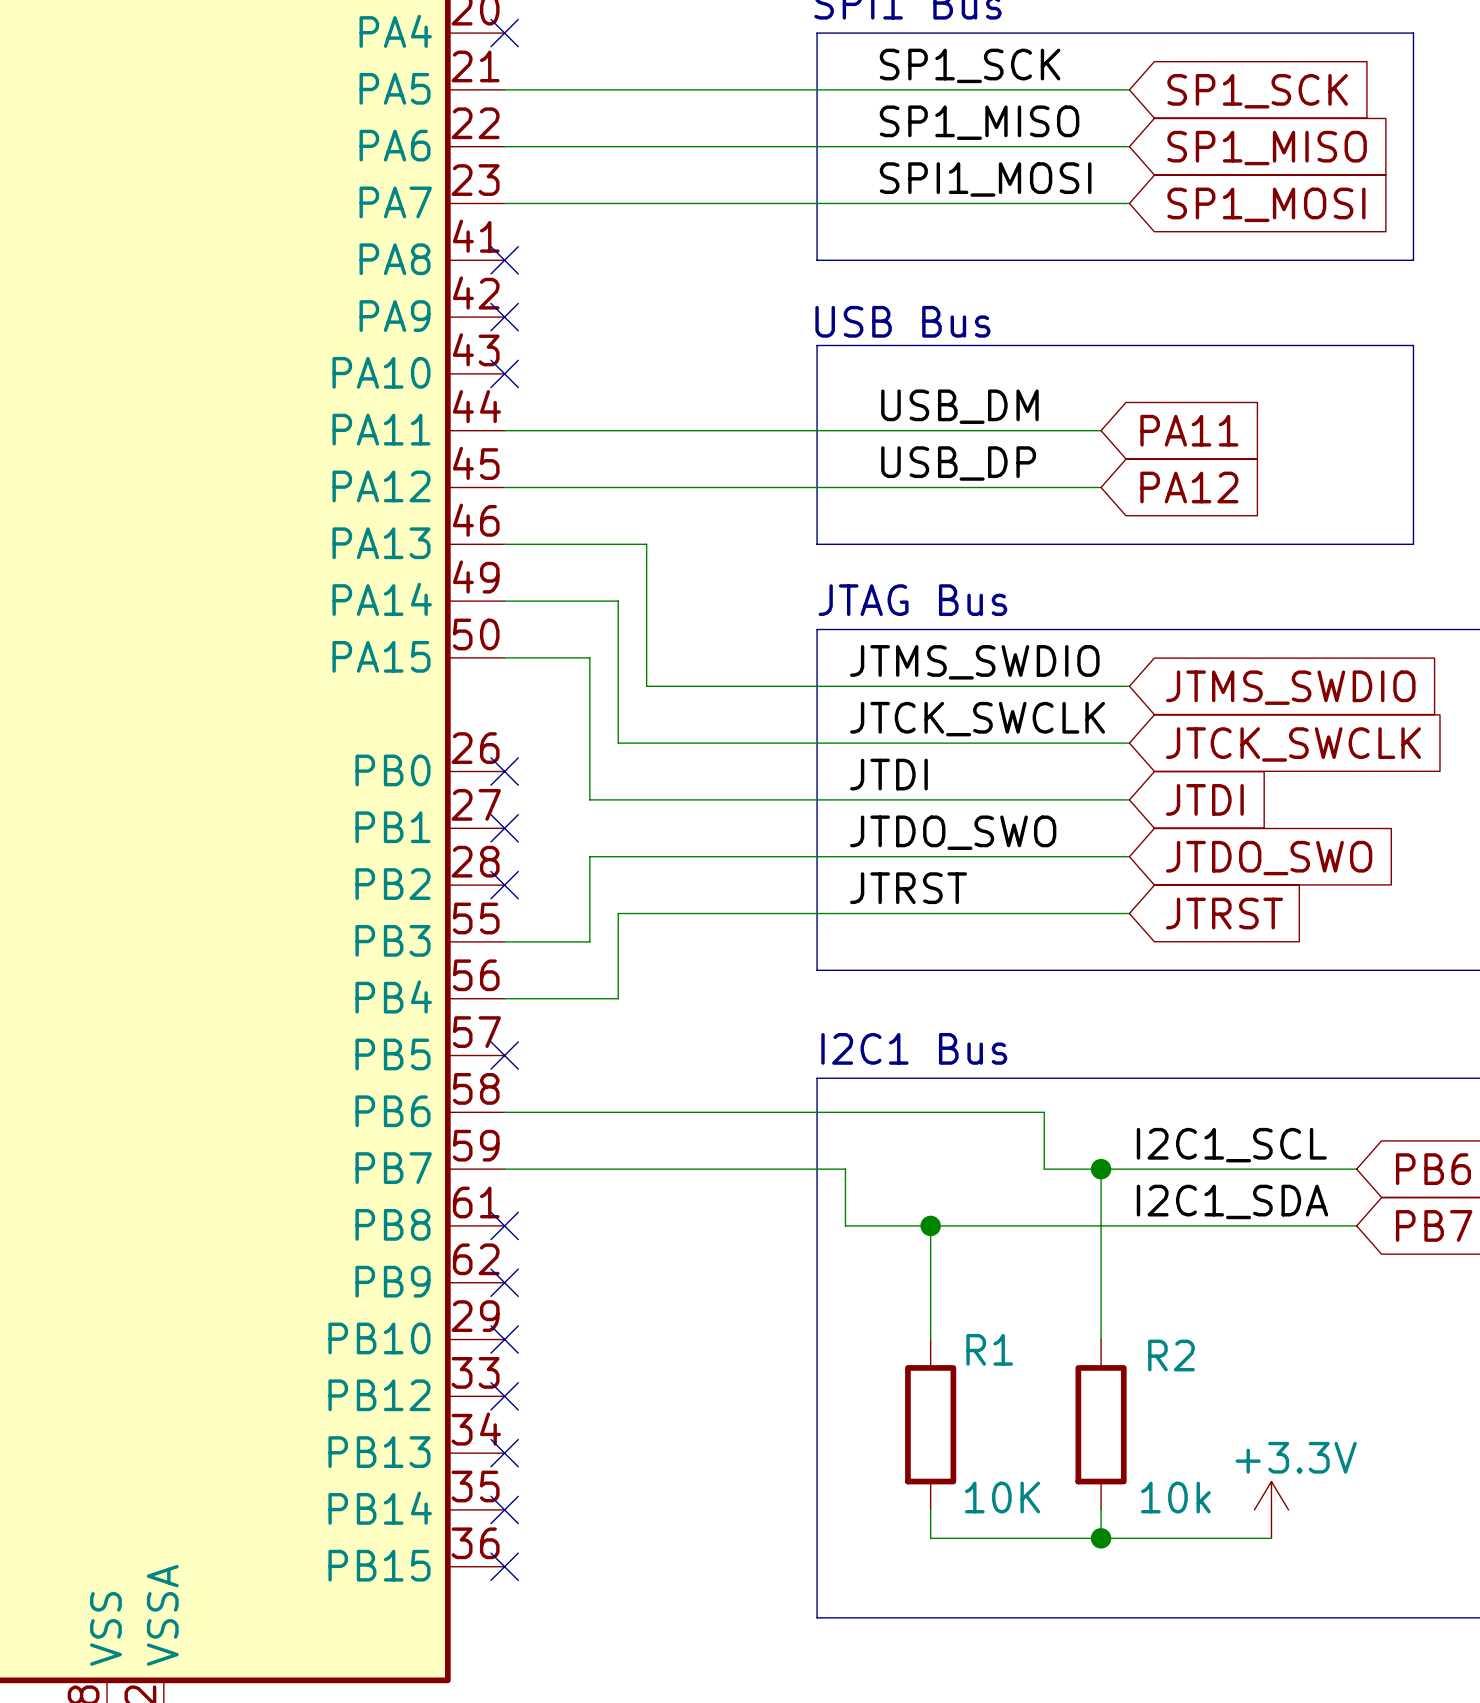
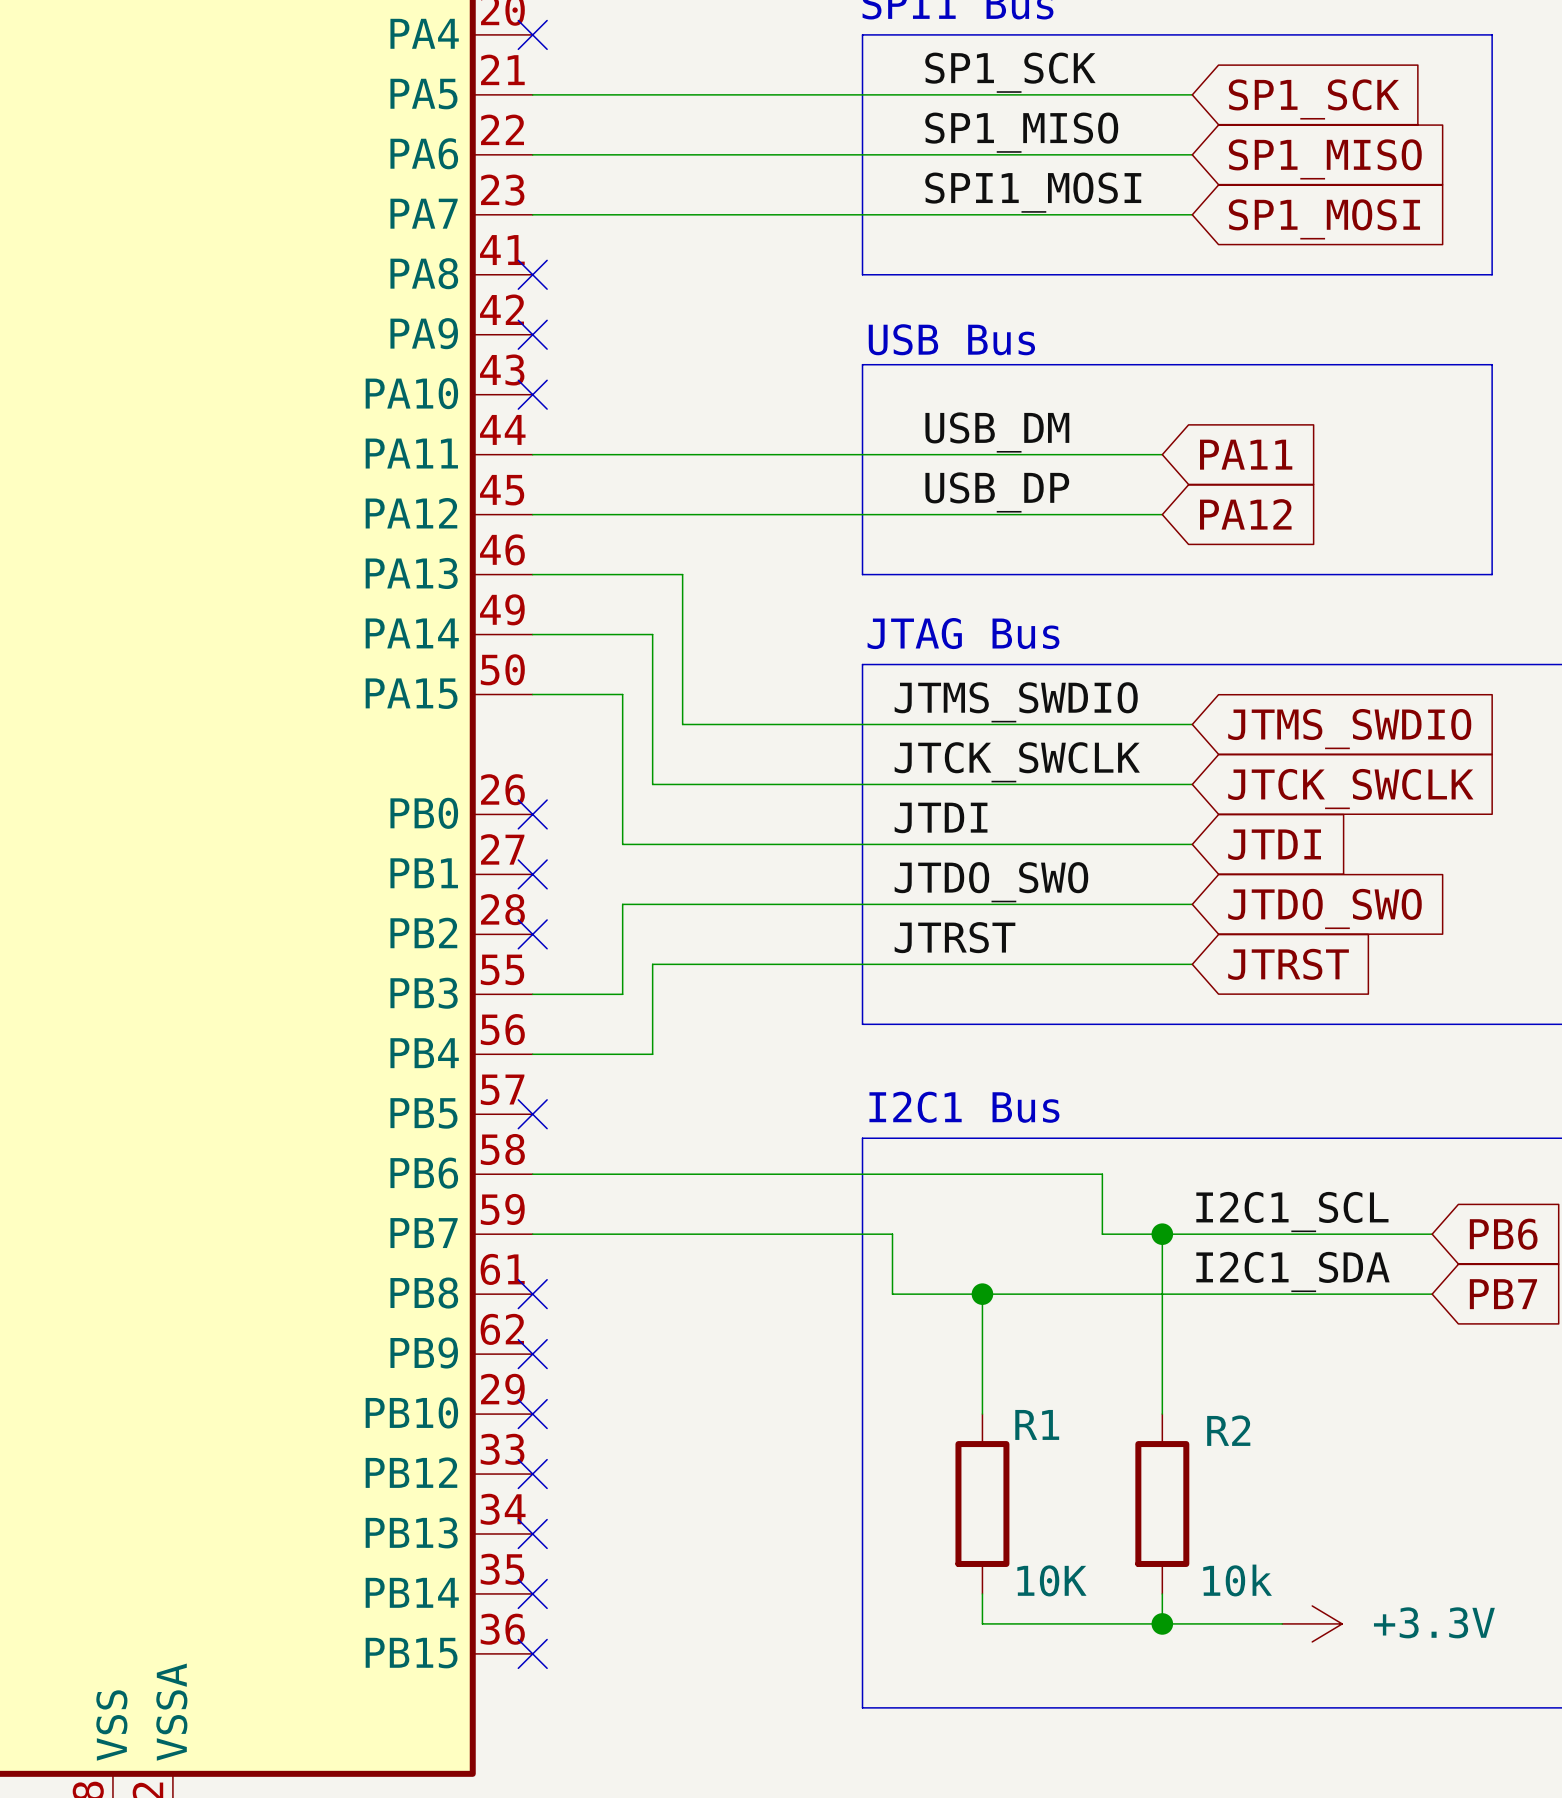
power symbol text position: +3.3V (1296, 1457) -> +3.3V (1434, 1622)
power symbol rotation: 0° (1271, 1509) -> 90° clockwise (1312, 1623)
power symbol position: +3.3V (1271, 1509) -> +3.3V (1312, 1623)

